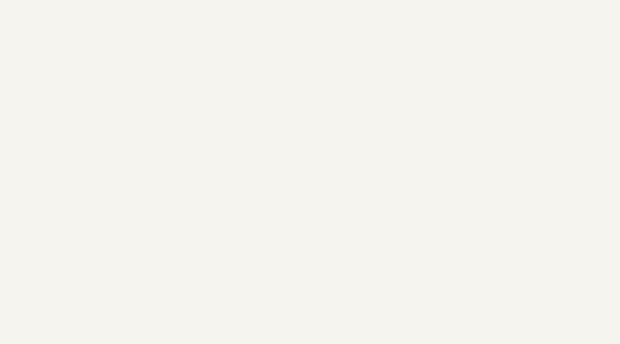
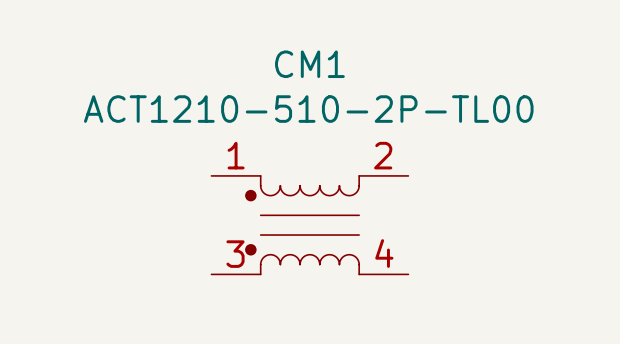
CM1: none -> ACT1210-510-2P-TL00 (309, 225)

